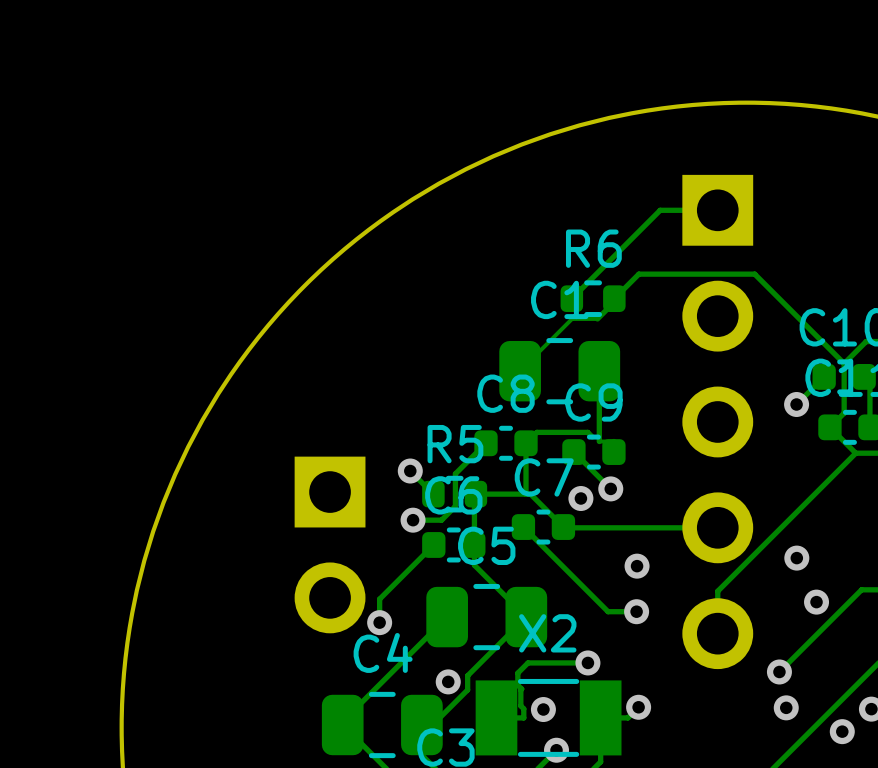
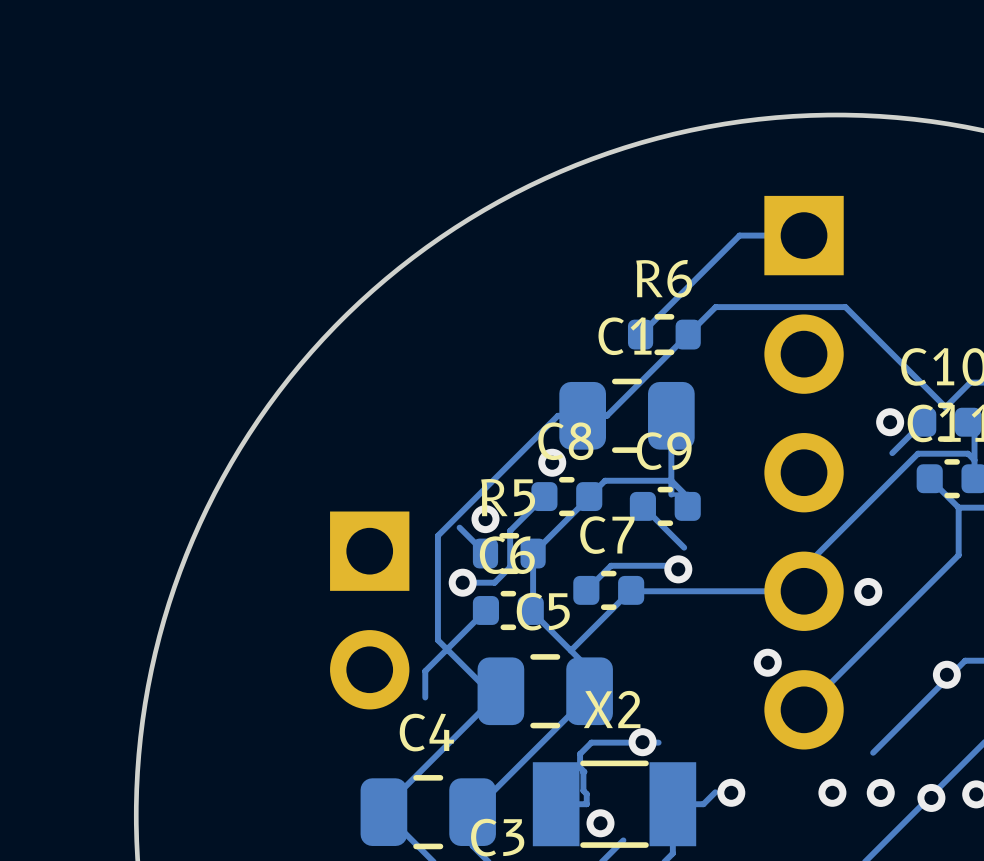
track: (614, 298) (614, 302) (597, 318) (572, 318) (520, 370) -> (688, 334) (606, 415) (557, 415) (437, 535) (437, 640) (488, 691) (500, 691)
track: (844, 363) (844, 413) (829, 427) -> none
via position: (796, 404) -> (890, 422)
track: none -> (974, 460) (968, 453) (917, 453) (804, 567) (804, 591)
via: none -> (552, 462)
track: (536, 432) (587, 432) (592, 436) (599, 436) -> (601, 484) (605, 480) (671, 480) (687, 497)
track: (526, 443) (526, 494) -> none
track: (855, 453) (717, 591) (717, 633) -> (958, 507) (958, 555) (804, 709)
via position: (410, 471) -> (485, 519)
via: (610, 488) -> none
via: (580, 498) -> none
via: none -> (678, 569)
track: (523, 527) (608, 611) (636, 611) -> (586, 590) (610, 565) (674, 565) (678, 569)
track: (563, 527) (530, 494) (474, 495) (474, 565) (526, 617) (467, 675) (467, 689) (432, 724) (421, 724) -> (589, 497) (533, 553) (533, 608) (530, 610) (589, 669) (589, 695) (472, 812)
track: none -> (631, 590) (570, 650)
via: none -> (868, 591)
via: (796, 558) -> none
via: (637, 566) -> none
via: none -> (767, 662)
via position: (816, 602) -> (946, 674)
via: (636, 611) -> none
via: (379, 622) -> none
via position: (587, 662) -> (642, 742)
via: (779, 671) -> none
via: (448, 681) -> none
via position: (638, 707) -> (731, 792)
via: none -> (832, 792)
via: (543, 709) -> none
via position: (842, 731) -> (931, 797)
via position: (556, 750) -> (600, 823)

